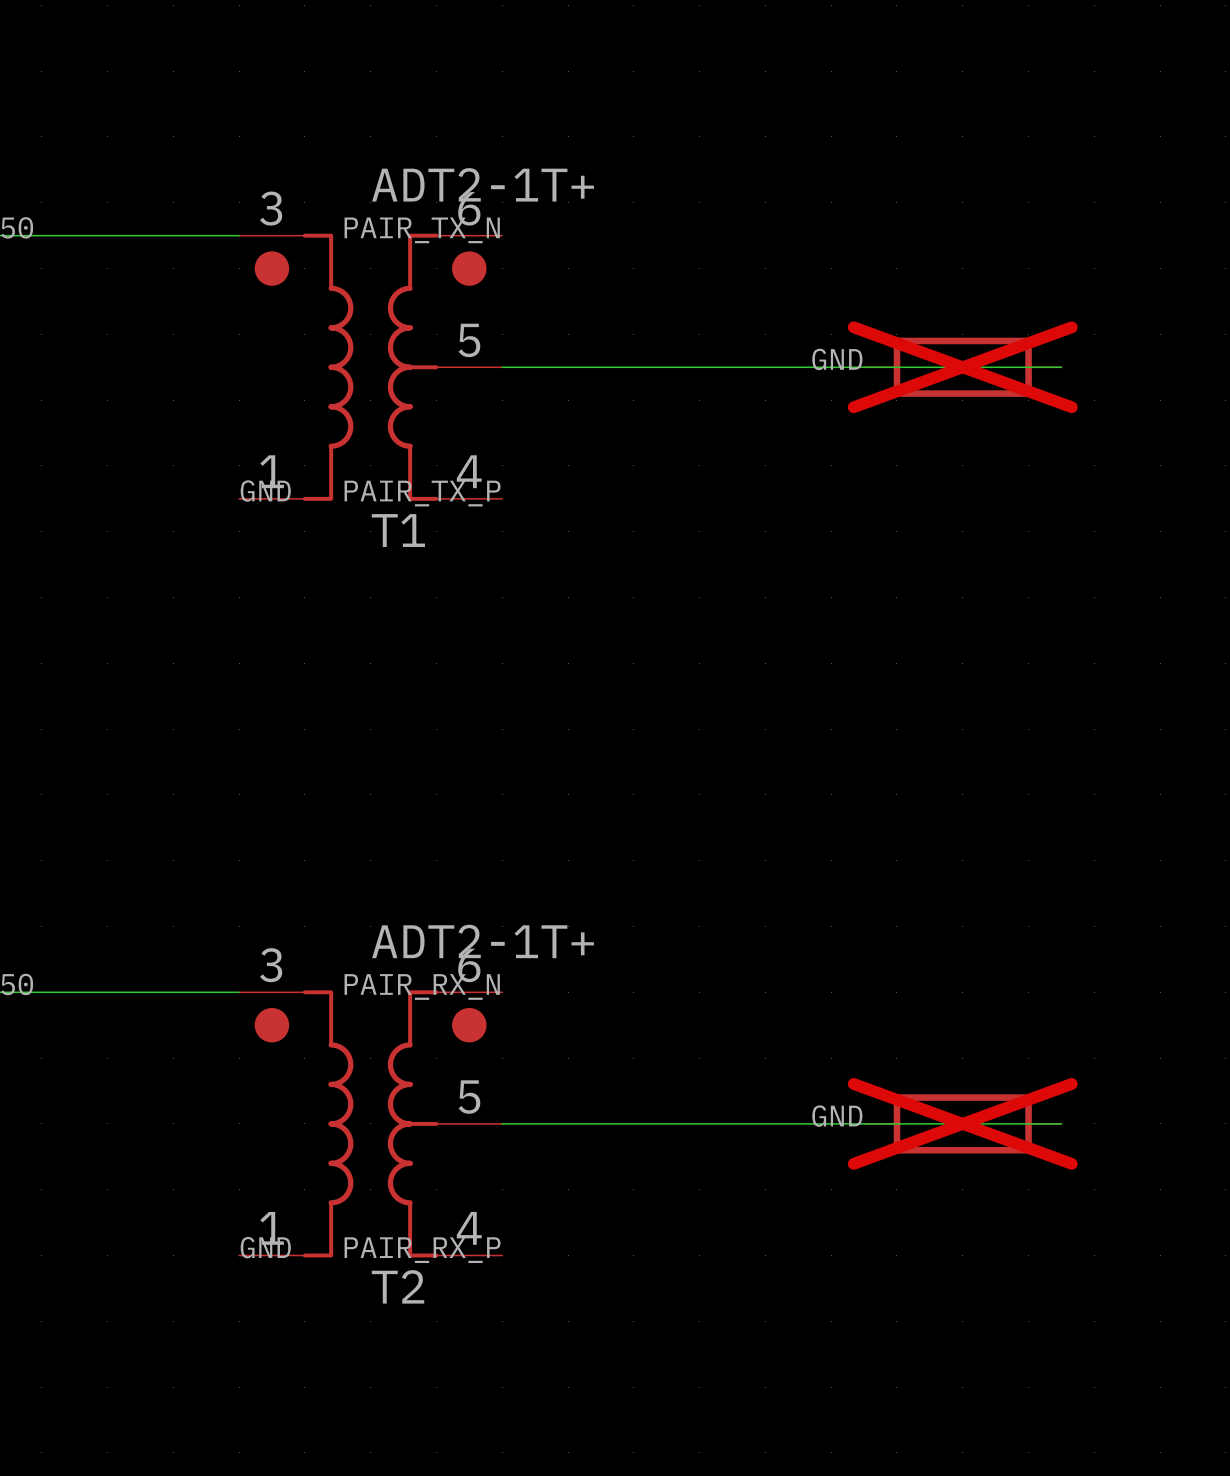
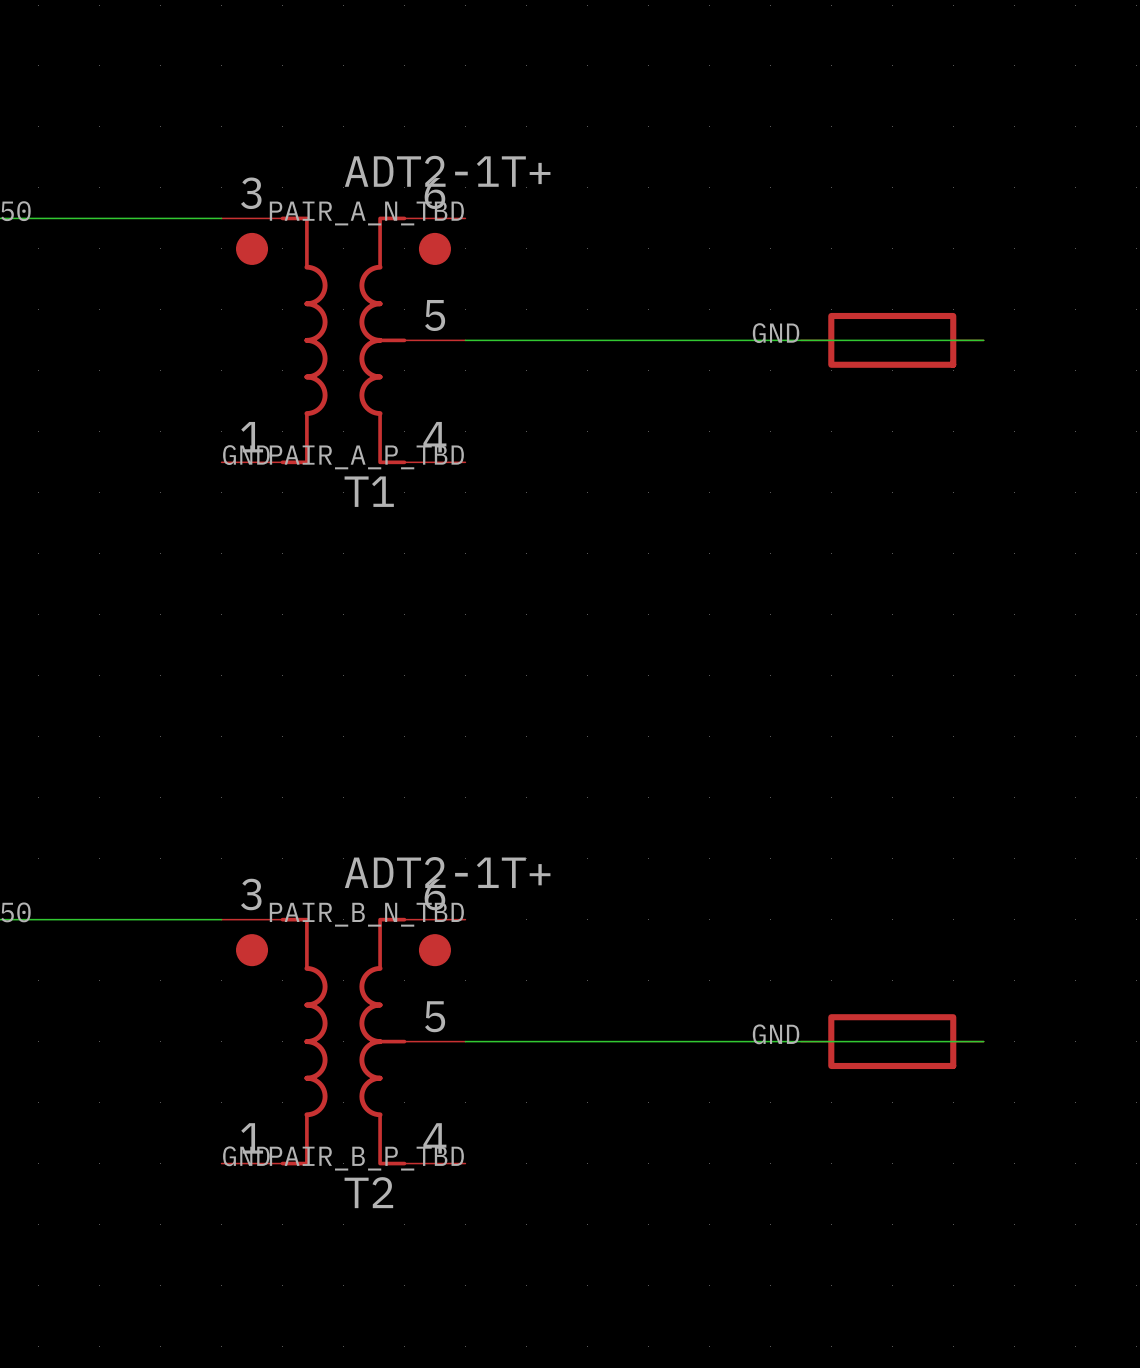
label: PAIR_TX_N (422, 230) -> PAIR_A_N_TBD (366, 213)
part do-not-place cross: (962, 367) -> none
label: PAIR_TX_P (422, 493) -> PAIR_A_P_TBD (366, 457)
label: PAIR_RX_N (422, 986) -> PAIR_B_N_TBD (366, 914)
part do-not-place cross: (962, 1123) -> none
label: PAIR_RX_P (422, 1250) -> PAIR_B_P_TBD (366, 1158)

